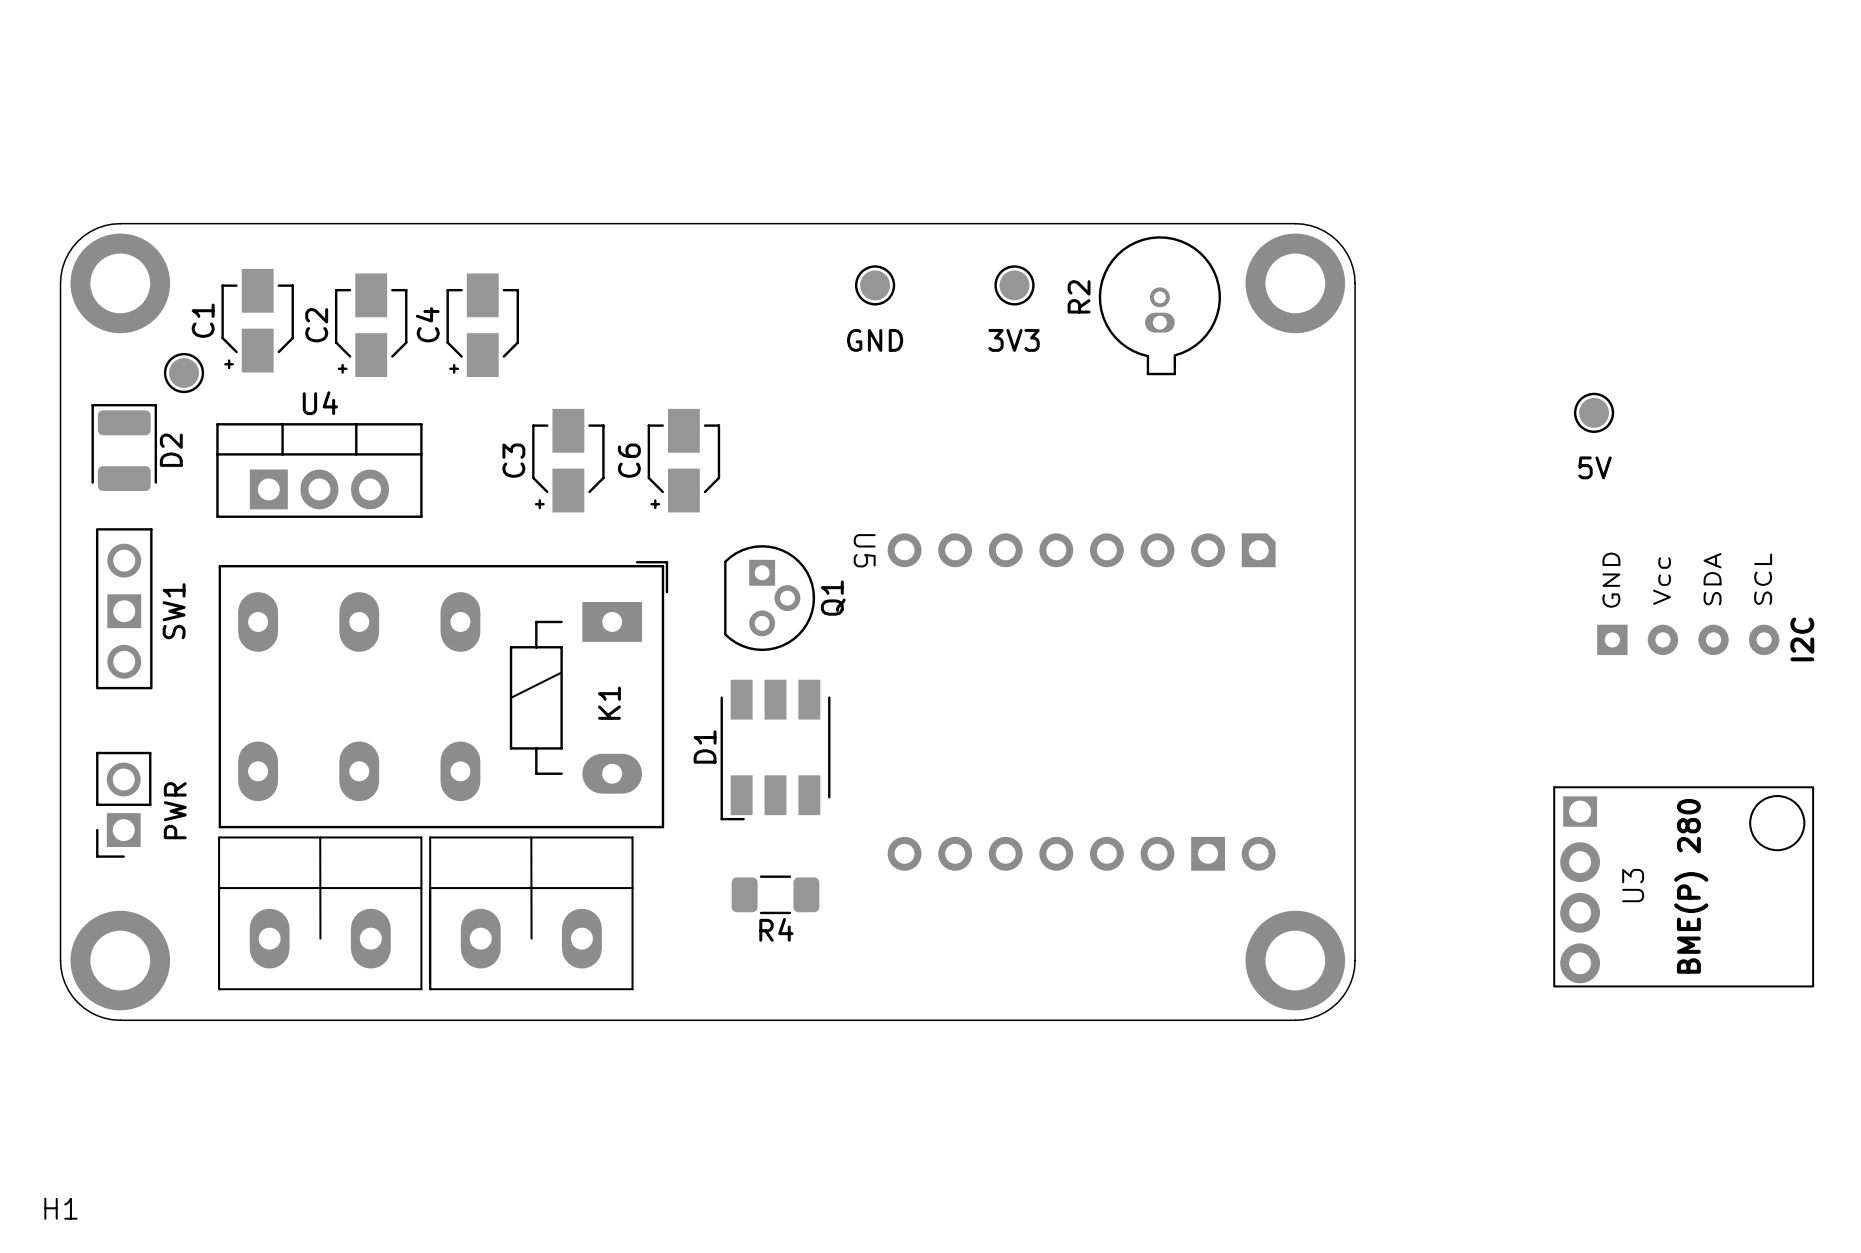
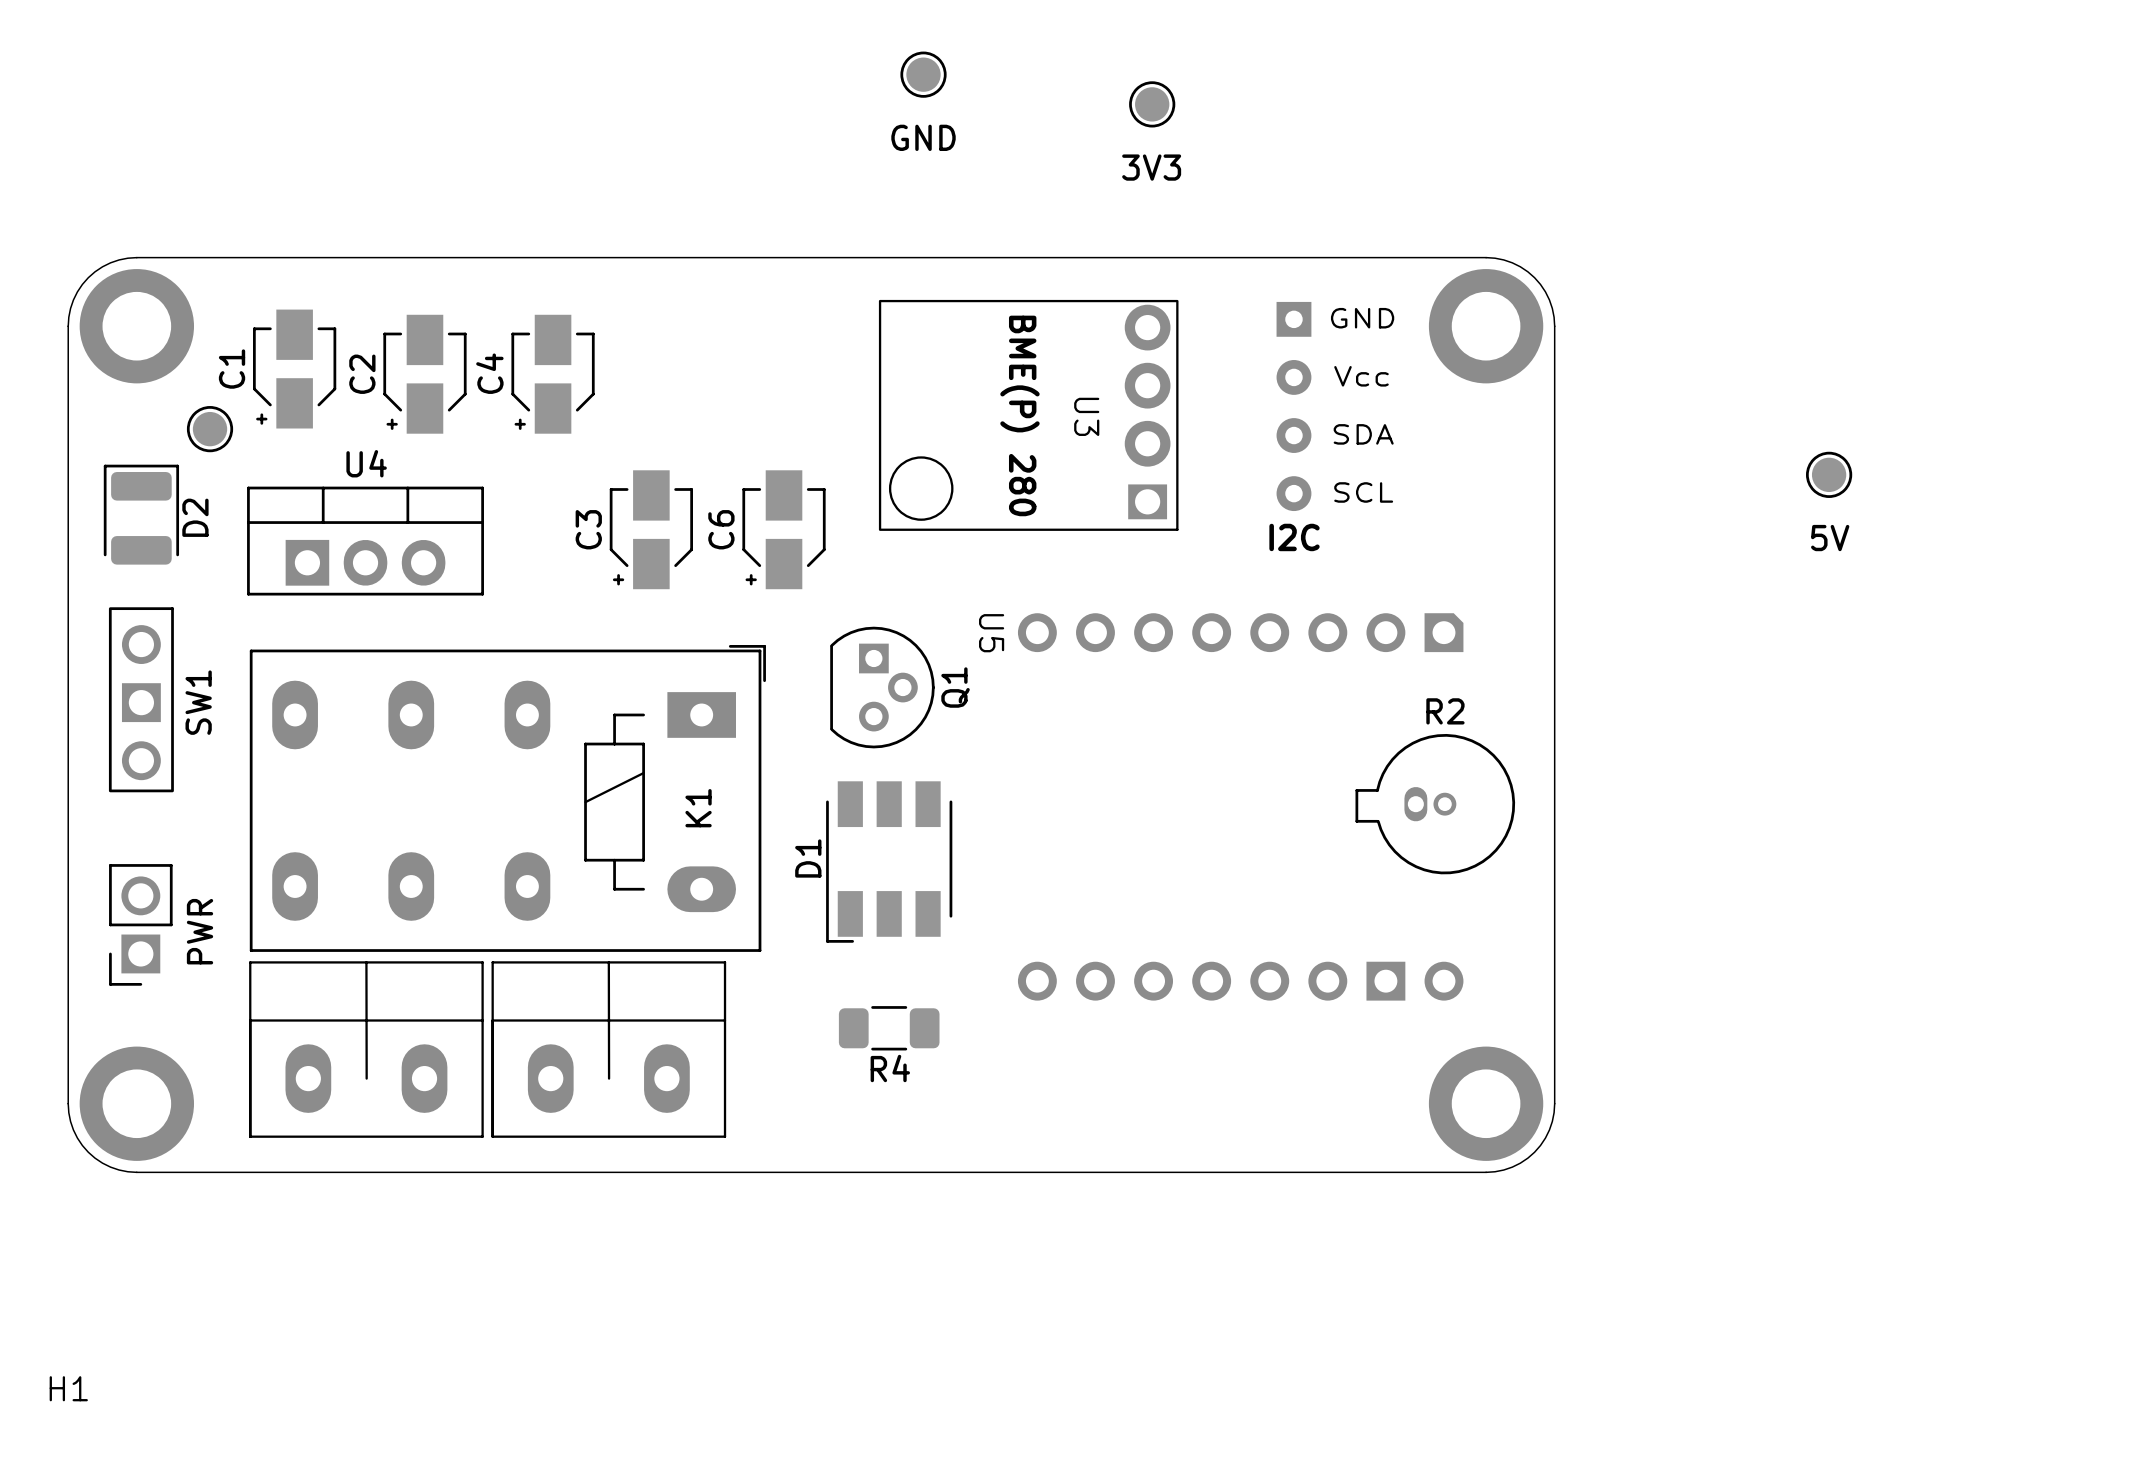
GND position: (875, 285) -> (923, 74)
3V3 position: (1014, 285) -> (1152, 104)
R2 rotation: 0° (1159, 305) -> 90° clockwise (1435, 804)
R2 position: (1159, 305) -> (1435, 804)
part: none -> (1293, 406)
part: (1688, 639) -> none
U3 rotation: 0° (1683, 886) -> 180° (1028, 415)
U3 position: (1683, 886) -> (1028, 415)

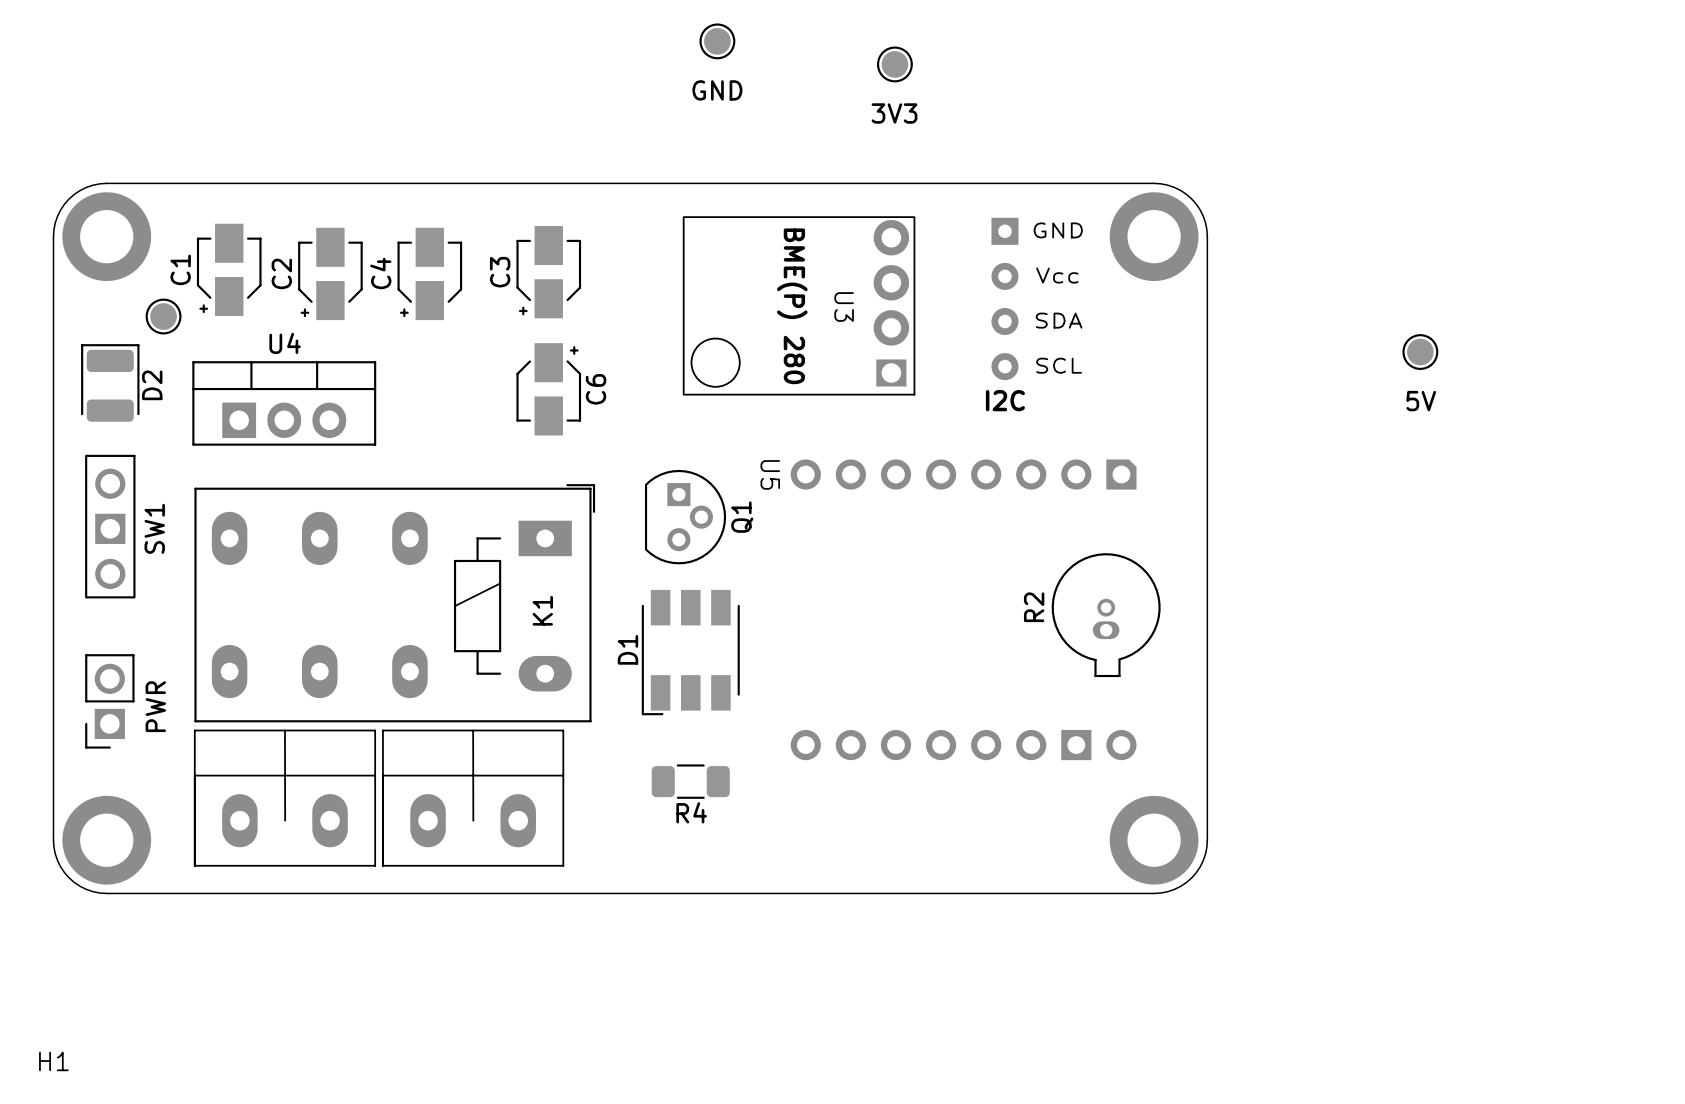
C3 position: (651, 529) -> (548, 272)
C6 rotation: 0° (784, 529) -> 180° (548, 389)
C6 position: (784, 529) -> (548, 389)
R2 rotation: 0° (1435, 804) -> 90° counterclockwise (1106, 615)

